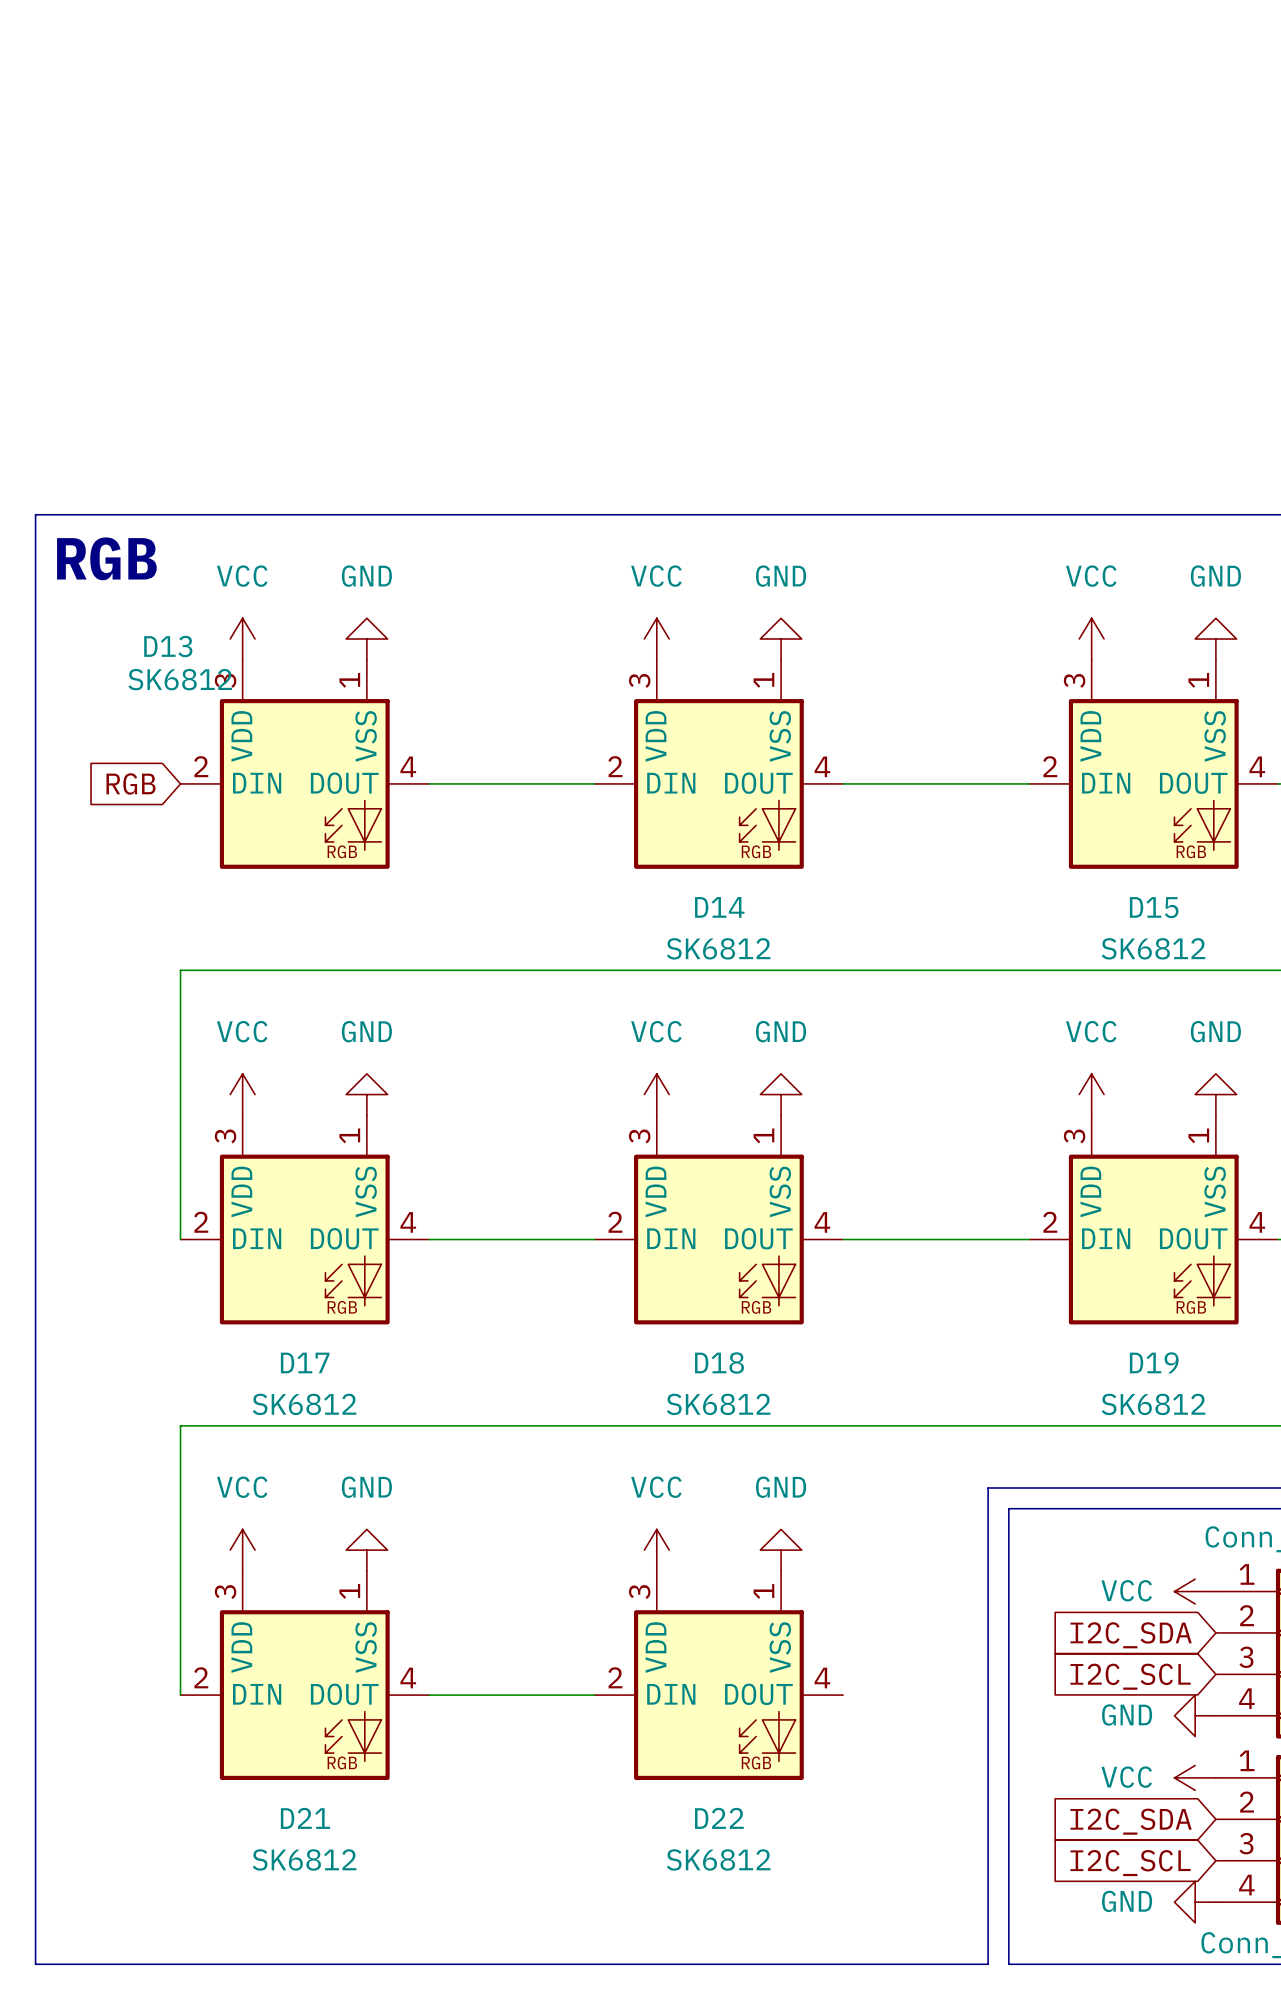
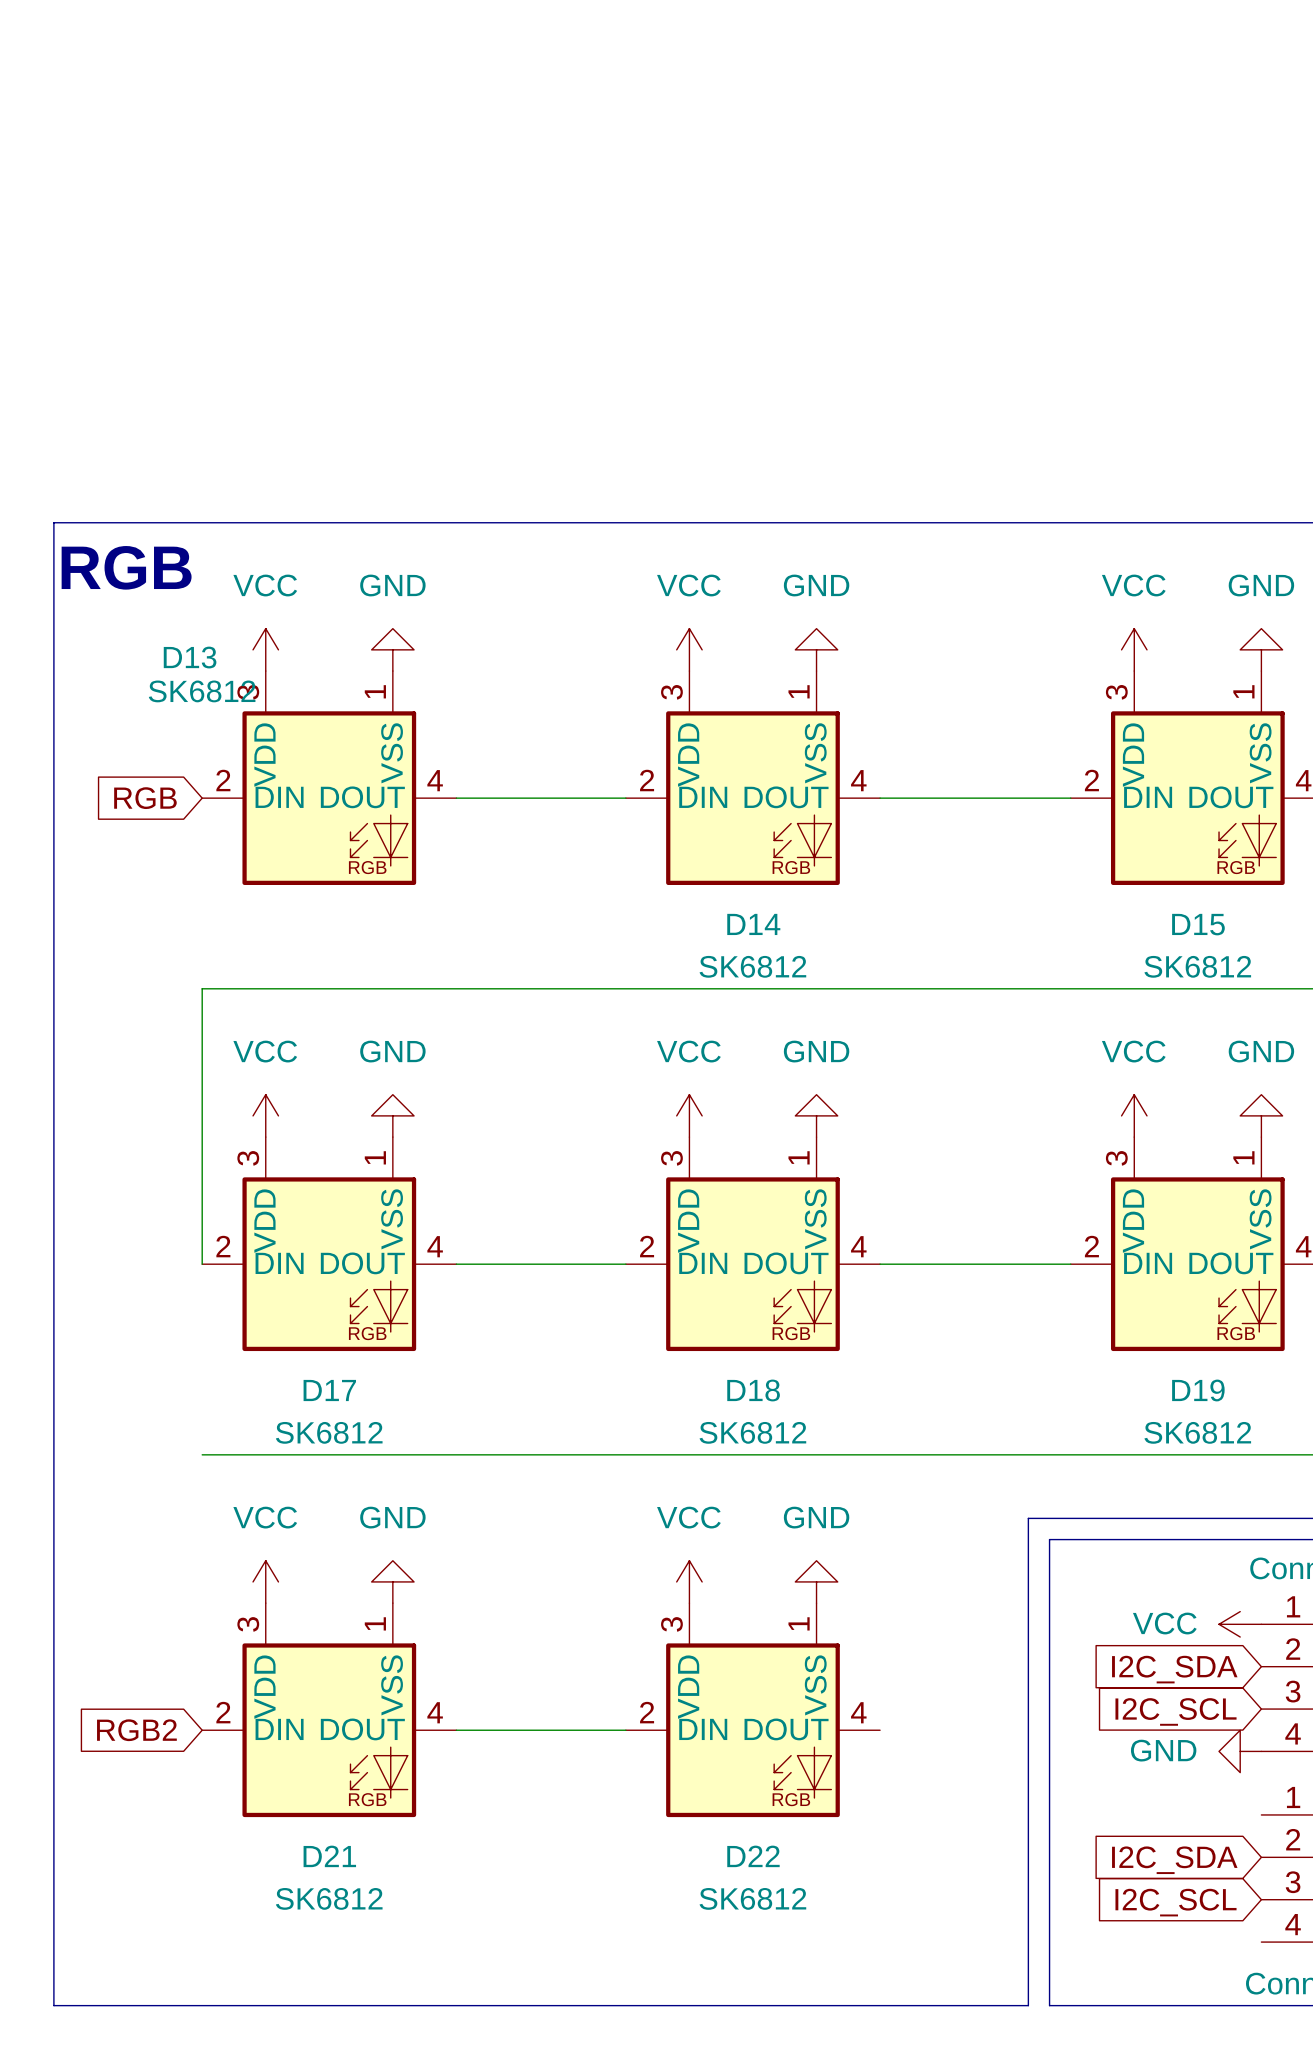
wire: (180, 1425) (180, 1695) -> none
global label: none -> RGB2 (136, 1730)
power symbol: VCC (1195, 1777) -> none
power symbol: GND (1195, 1902) -> none

